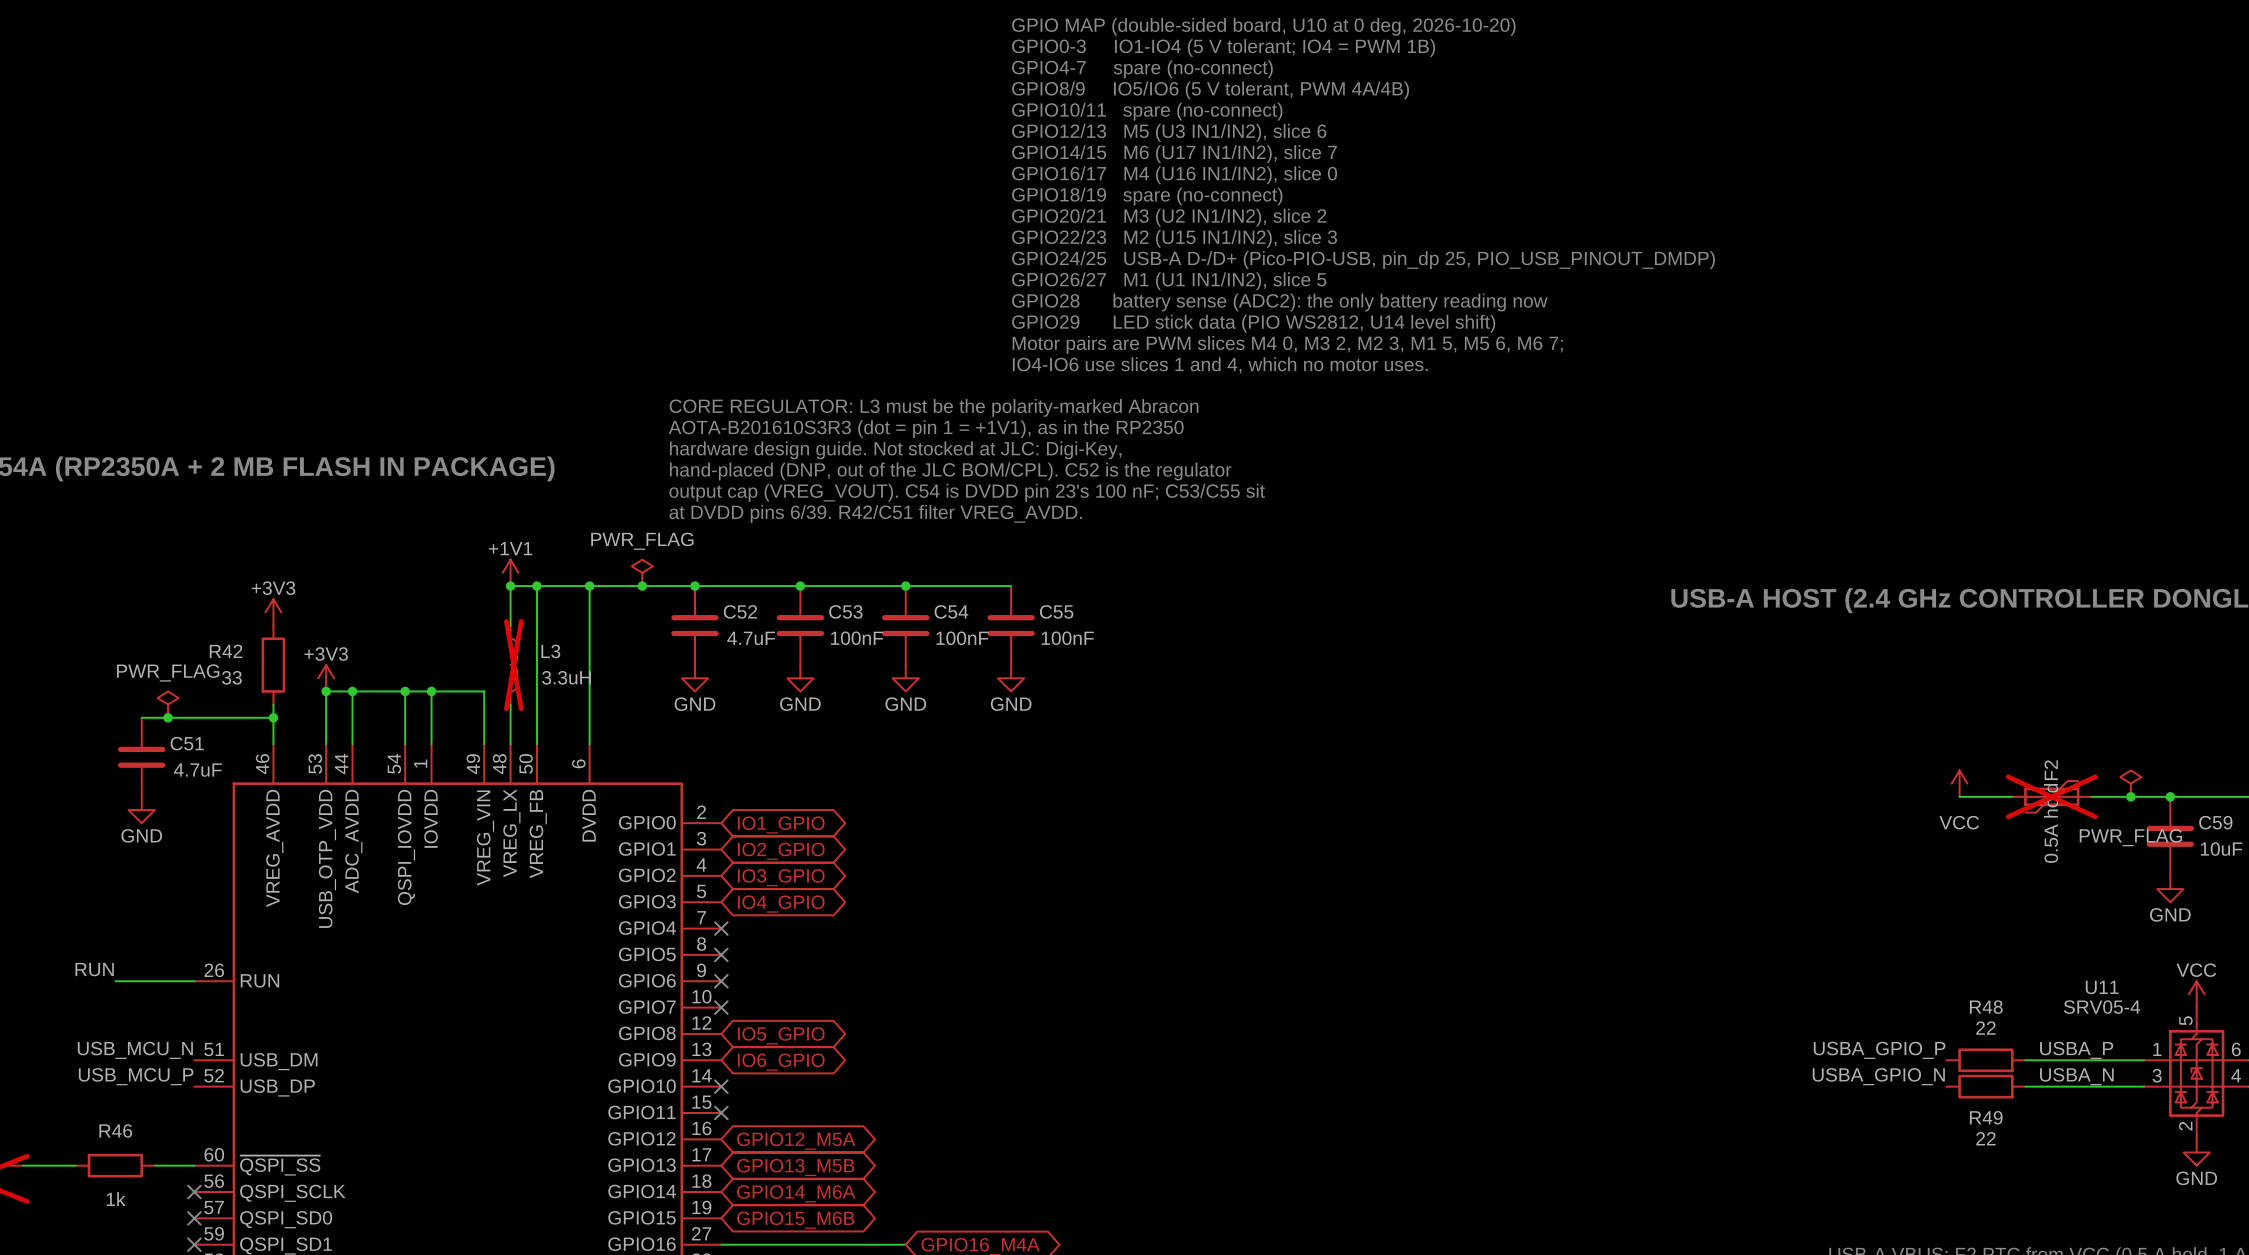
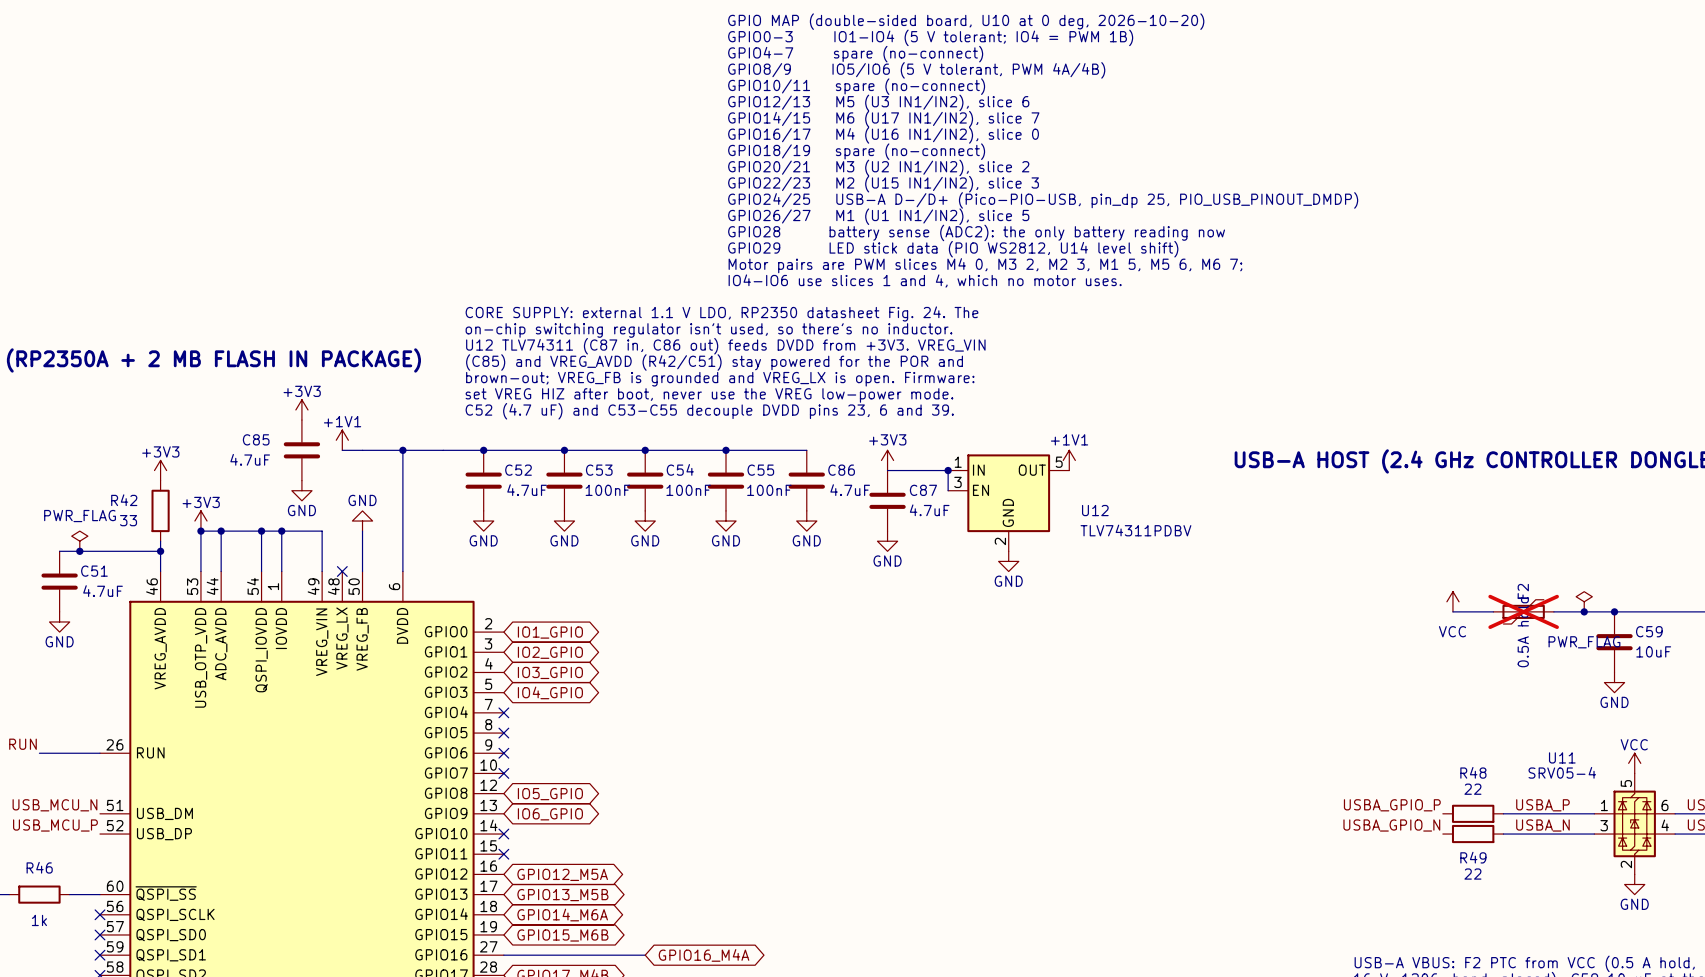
text: CORE REGULATOR: L3 must be the polarity-marked Abracon (934, 407) -> CORE SUPPLY: external 1.1 V LDO, RP2350 datasheet Fig. 24. The (721, 313)
text: AOTA-B201610S3R3 (dot = pin 1 = +1V1), as in the RP2350 (926, 429) -> on-chip switching regulator isn't used, so there's no inductor. (709, 330)
text: hardware design guide. Not stocked at JLC: Digi-Key, (895, 450) -> U12 TLV74311 (C87 in, C86 out) feeds DVDD from +3V3. VREG_VIN (725, 346)
text: hand-placed (DNP, out of the JLC BOM/CPL). C52 is the regulator (950, 471) -> (C85) and VREG_AVDD (R42/C51) stay powered for the POR and (714, 362)
text: output cap (VREG_VOUT). C54 is DVDD pin 23's 100 nF; C53/C55 sit (967, 492) -> brown-out; VREG_FB is grounded and VREG_LX is open. Firmware: (720, 379)
text: at DVDD pins 6/39. R42/C51 filter VREG_AVDD. (875, 513) -> set VREG HIZ after boot, never use the VREG low-power mode. (709, 395)
power symbol: none -> +3V3 (301, 409)
text: none -> C52 (4.7 uF) and C53-C55 decouple DVDD pins 23, 6 and 39. (709, 411)
power symbol: PWR_FLAG (642, 572) -> none
C85: none -> 4.7uF (301, 450)
wire: (510, 586) (510, 625) -> none
junction: (510, 586) -> none
wire: (536, 586) (536, 691) -> none
junction: (536, 586) -> none
junction: (642, 586) -> none
wire: none -> (726, 450) (806, 450)
junction: none -> (726, 450)
power symbol: none -> +3V3 (887, 460)
power symbol: none -> +1V1 (1069, 460)
wire: none -> (887, 470) (948, 470) (948, 490)
junction: none -> (948, 470)
C86: none -> 4.7uF (806, 480)
power symbol: none -> GND (301, 490)
C87: none -> 4.7uF (887, 500)
U12: none -> TLV74311PDBV (1008, 502)
L3: 3.3uH (513, 665) -> none
power symbol: none -> GND (362, 521)
power symbol: none -> GND (806, 521)
wire: (510, 704) (510, 744) -> none
power symbol: none -> GND (887, 541)
power symbol: none -> GND (1008, 561)
no-connect mark: none -> (342, 571)

